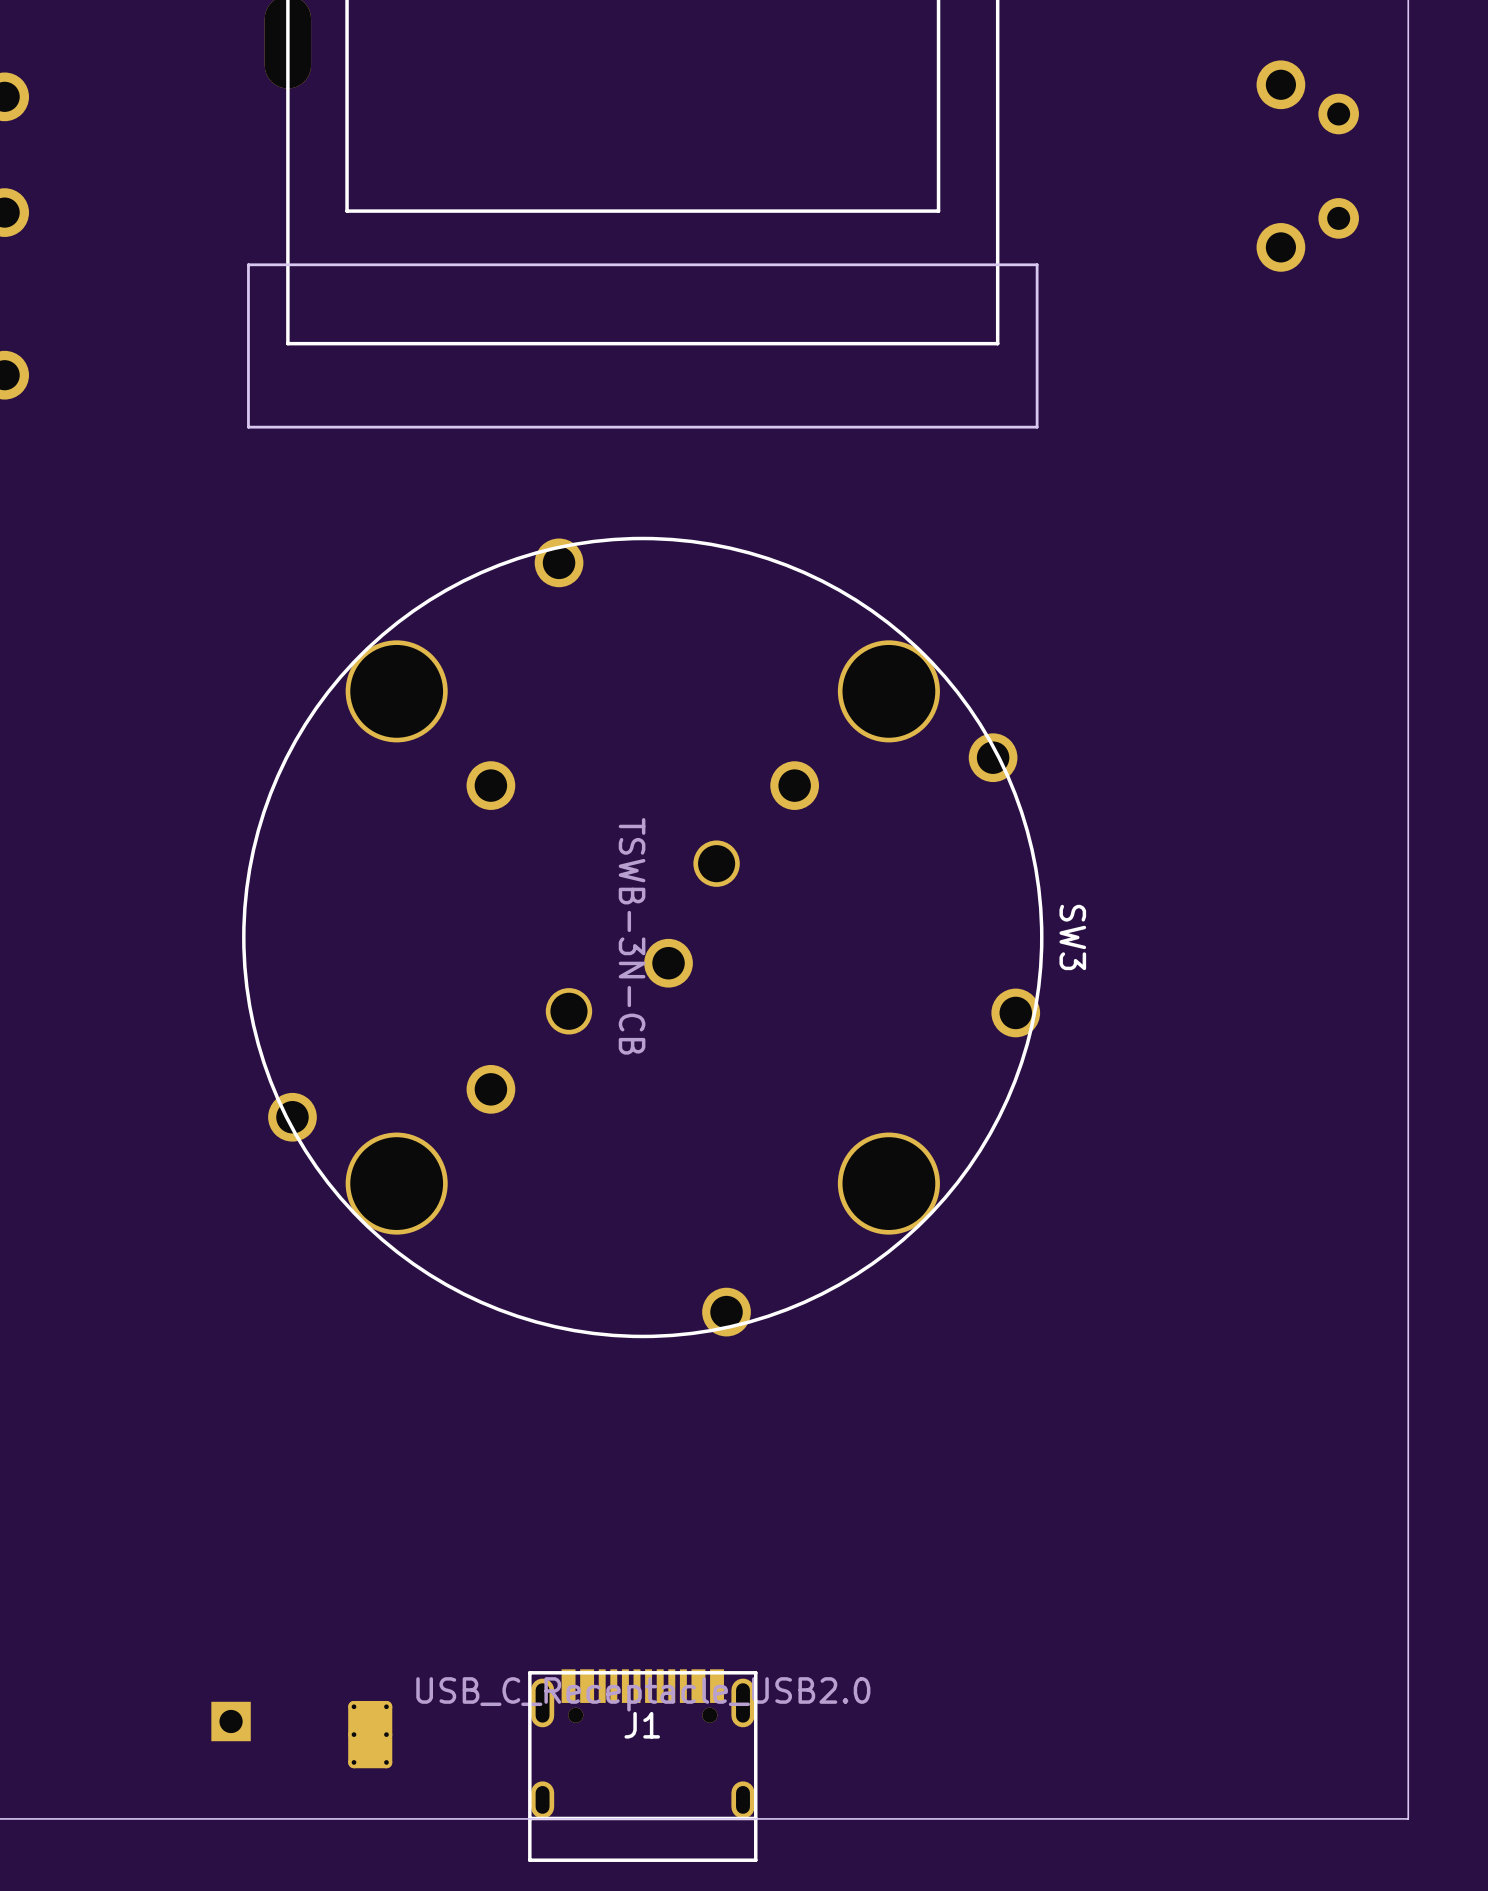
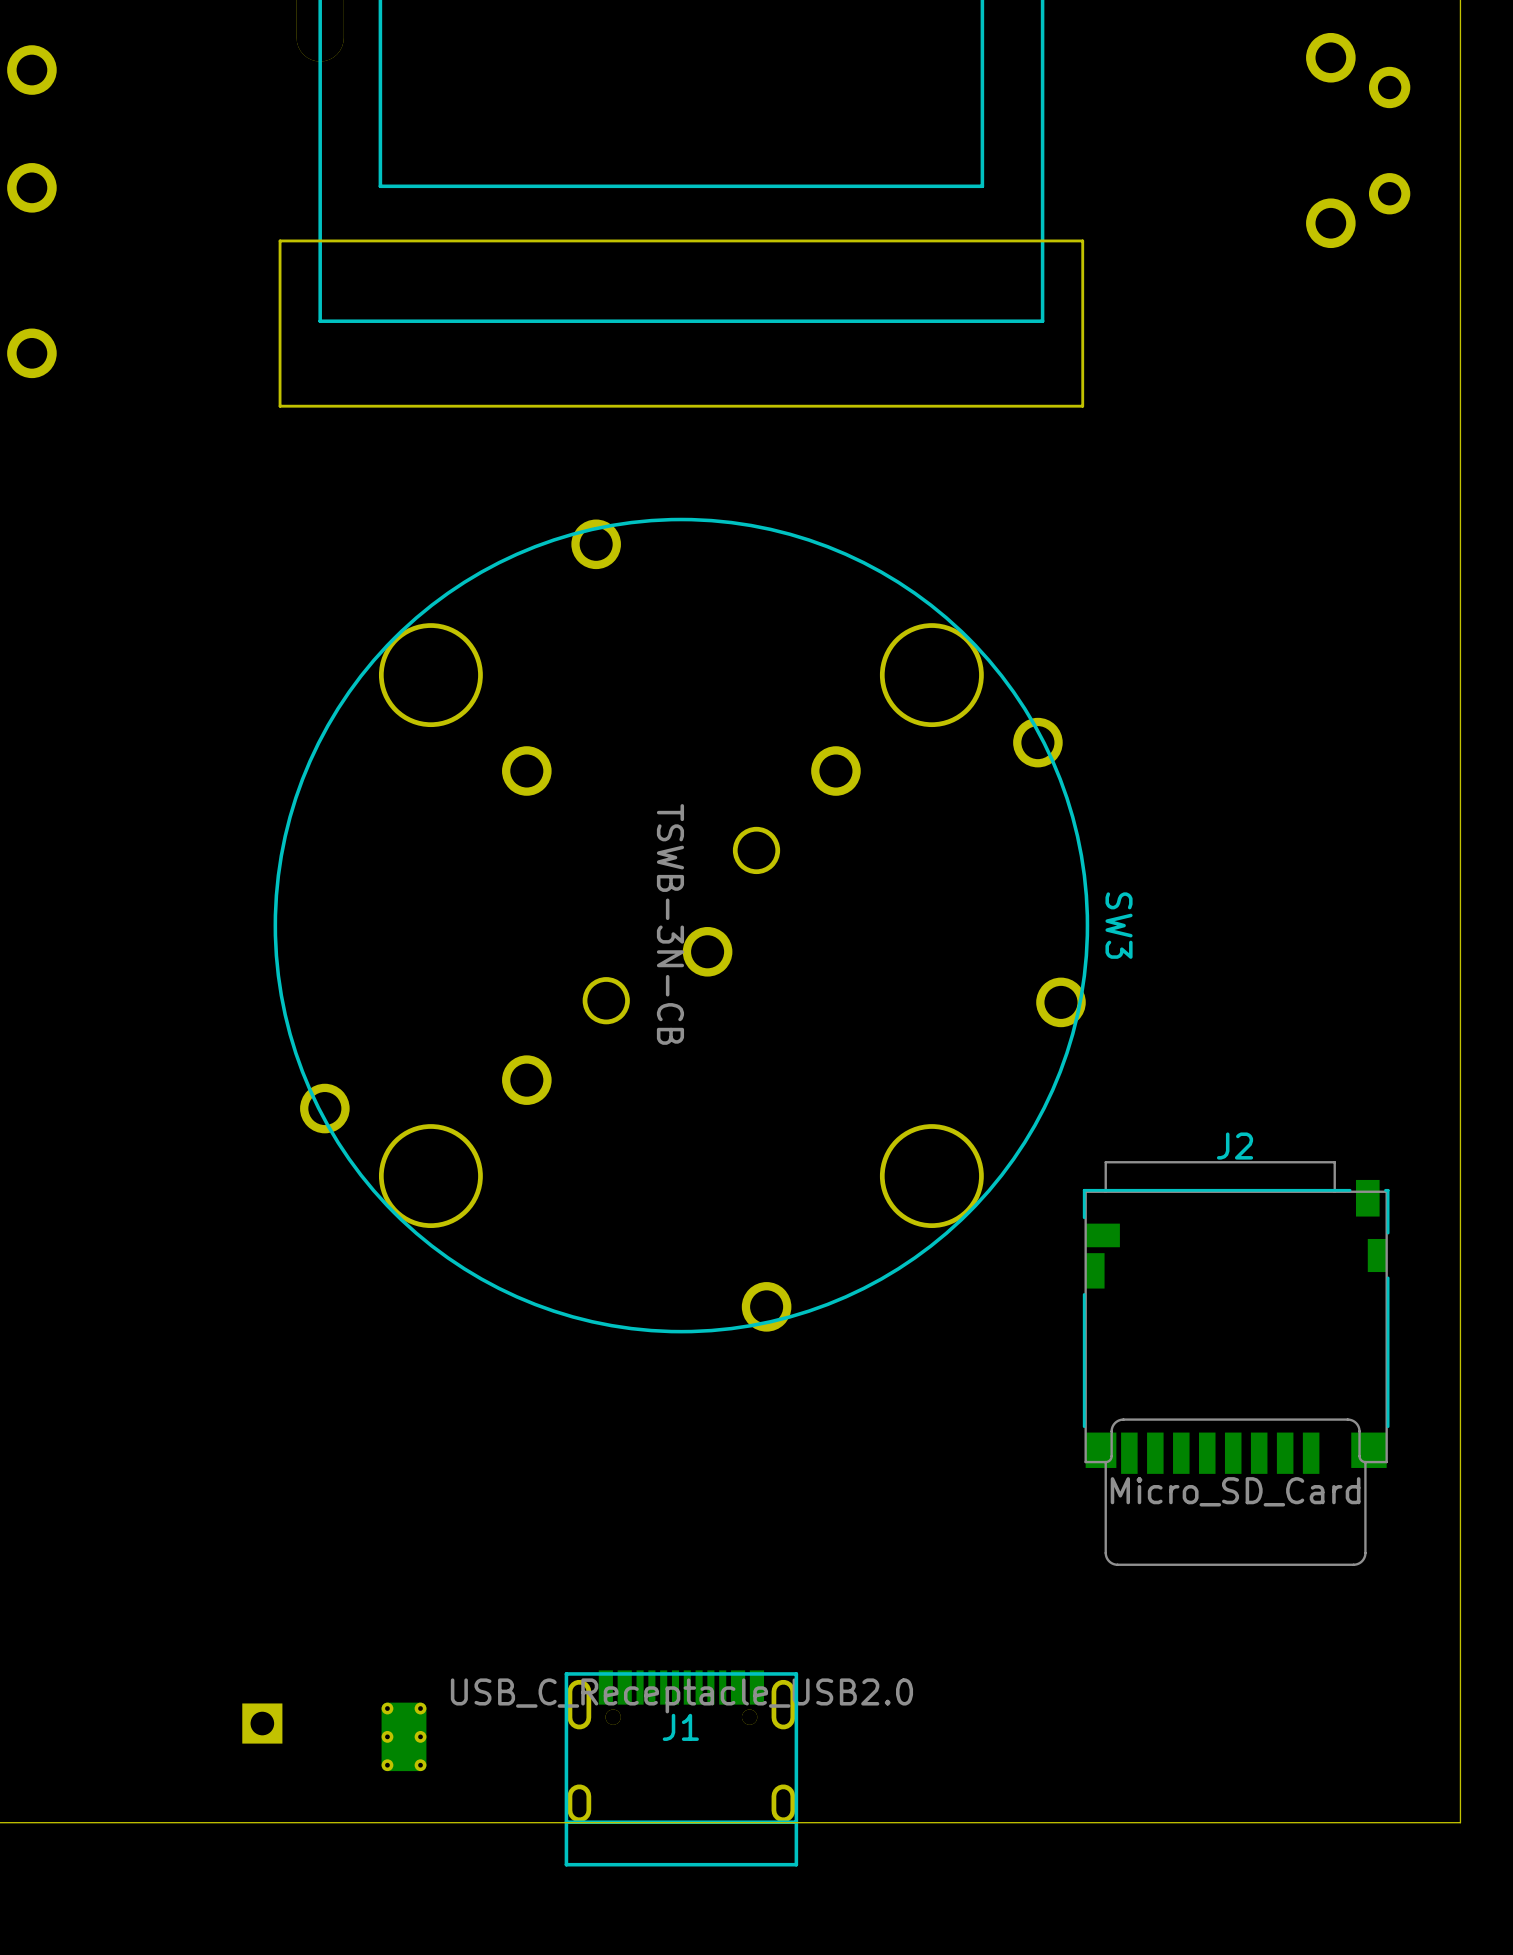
J2: none -> Micro_SD_Card (1236, 1363)

